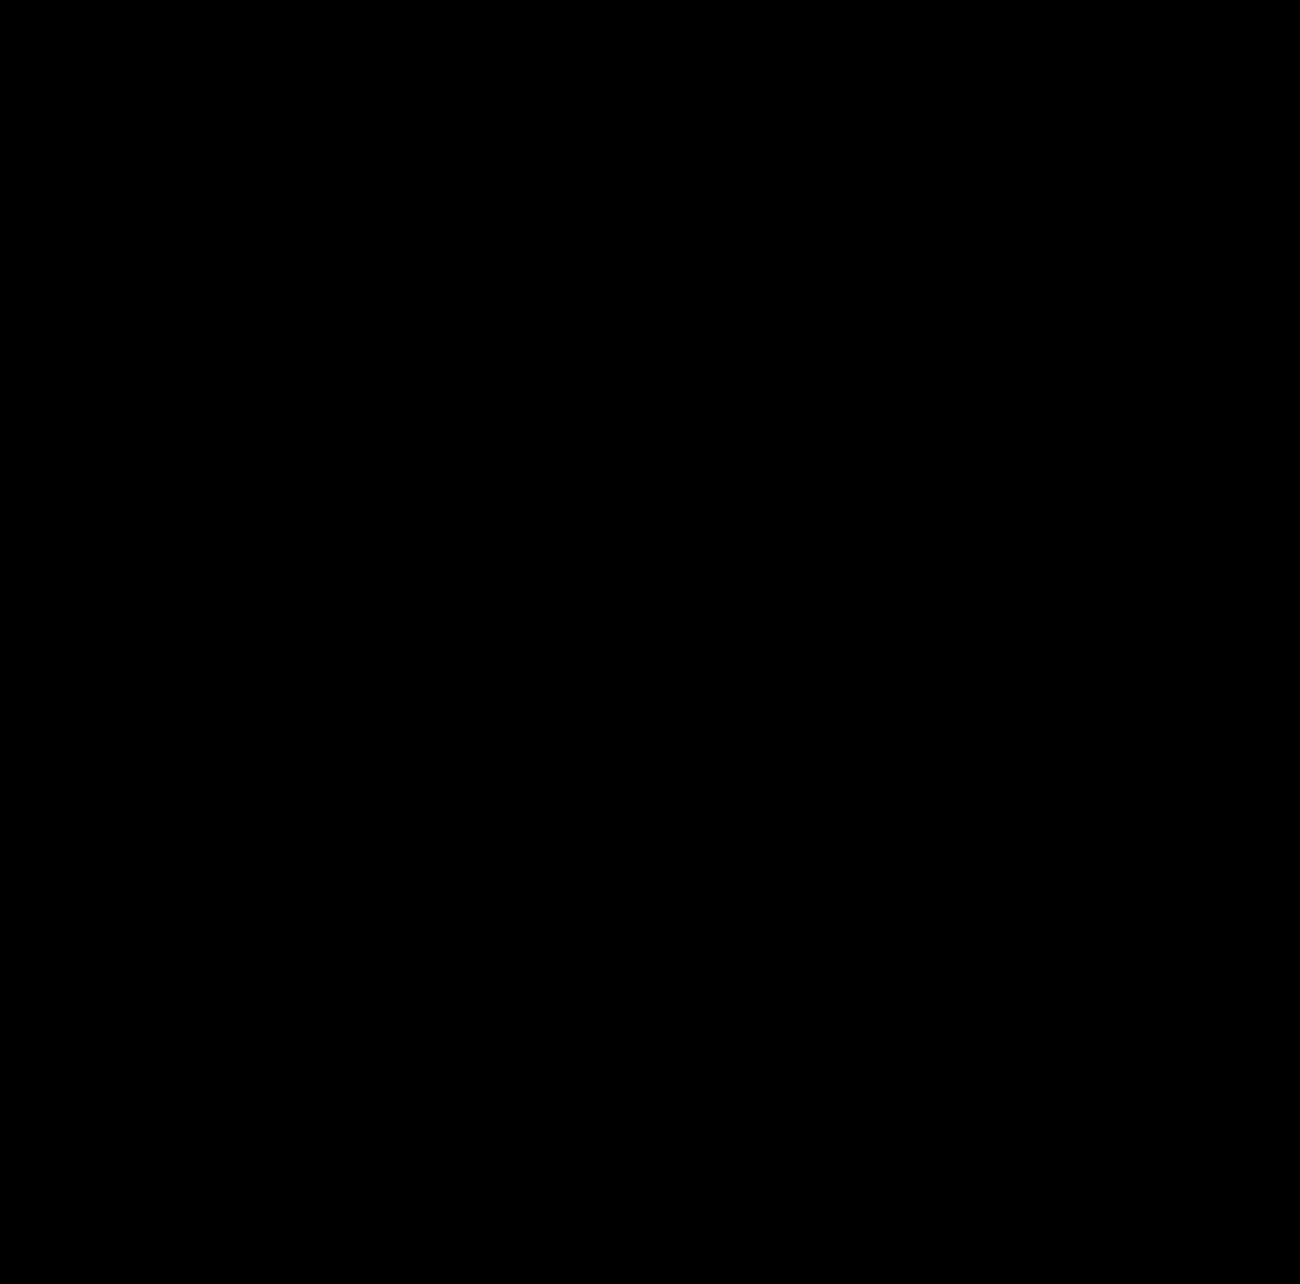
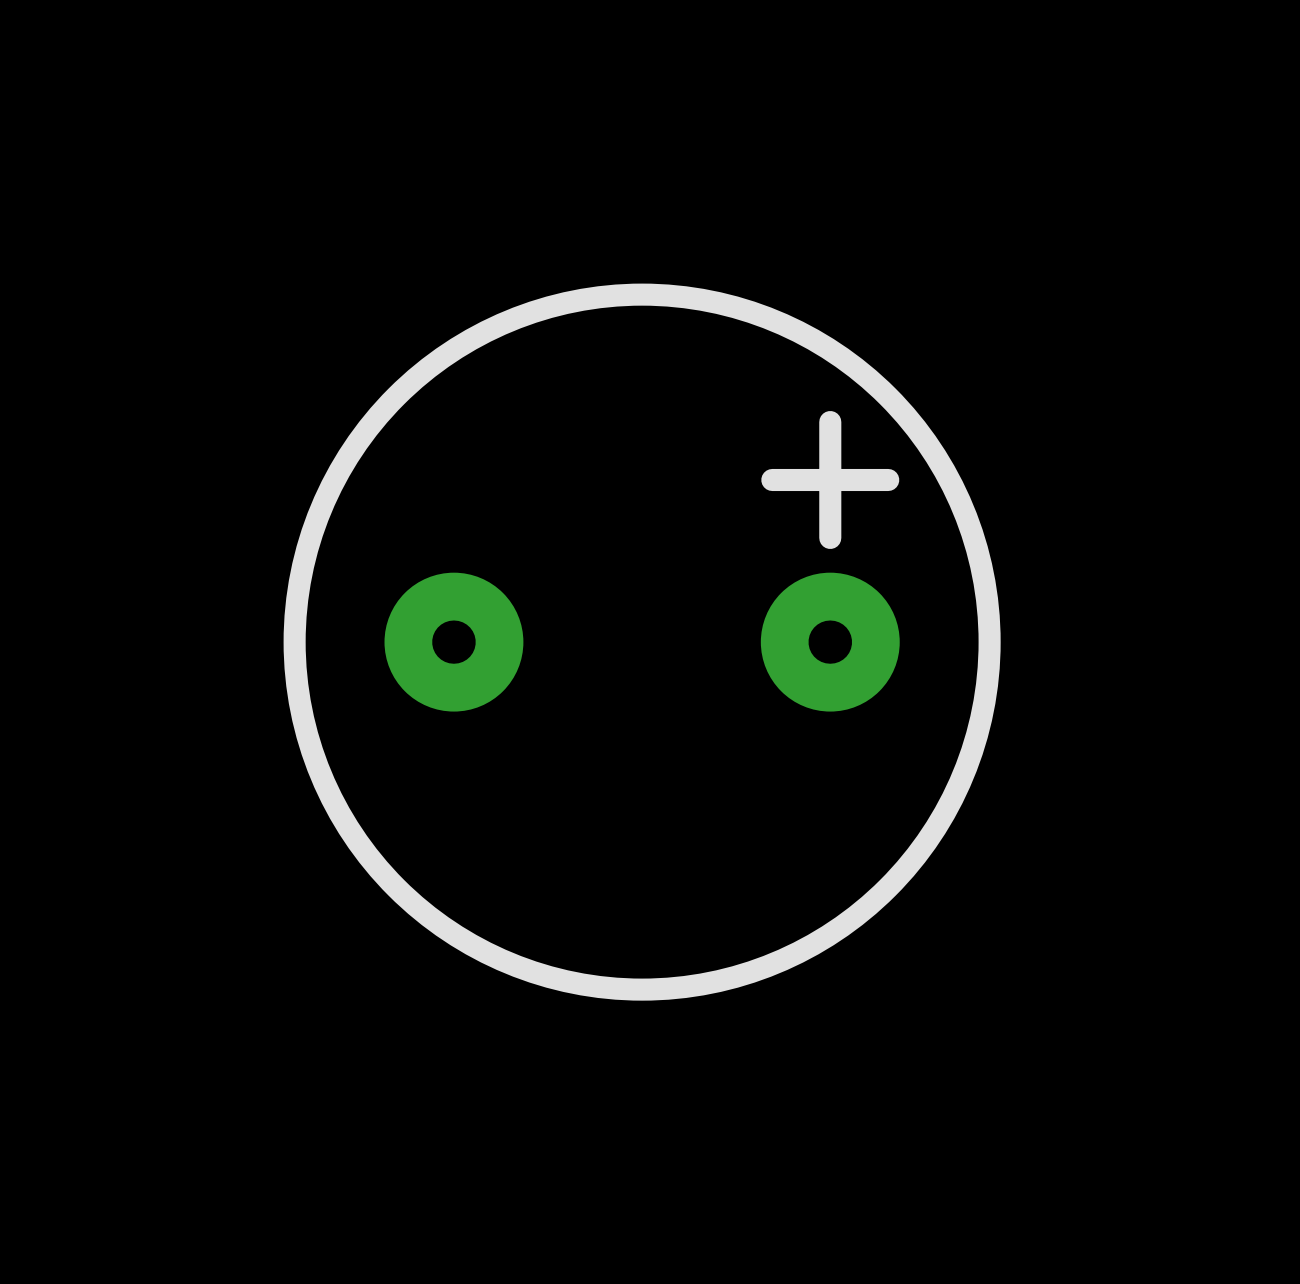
part: none -> (642, 642)

